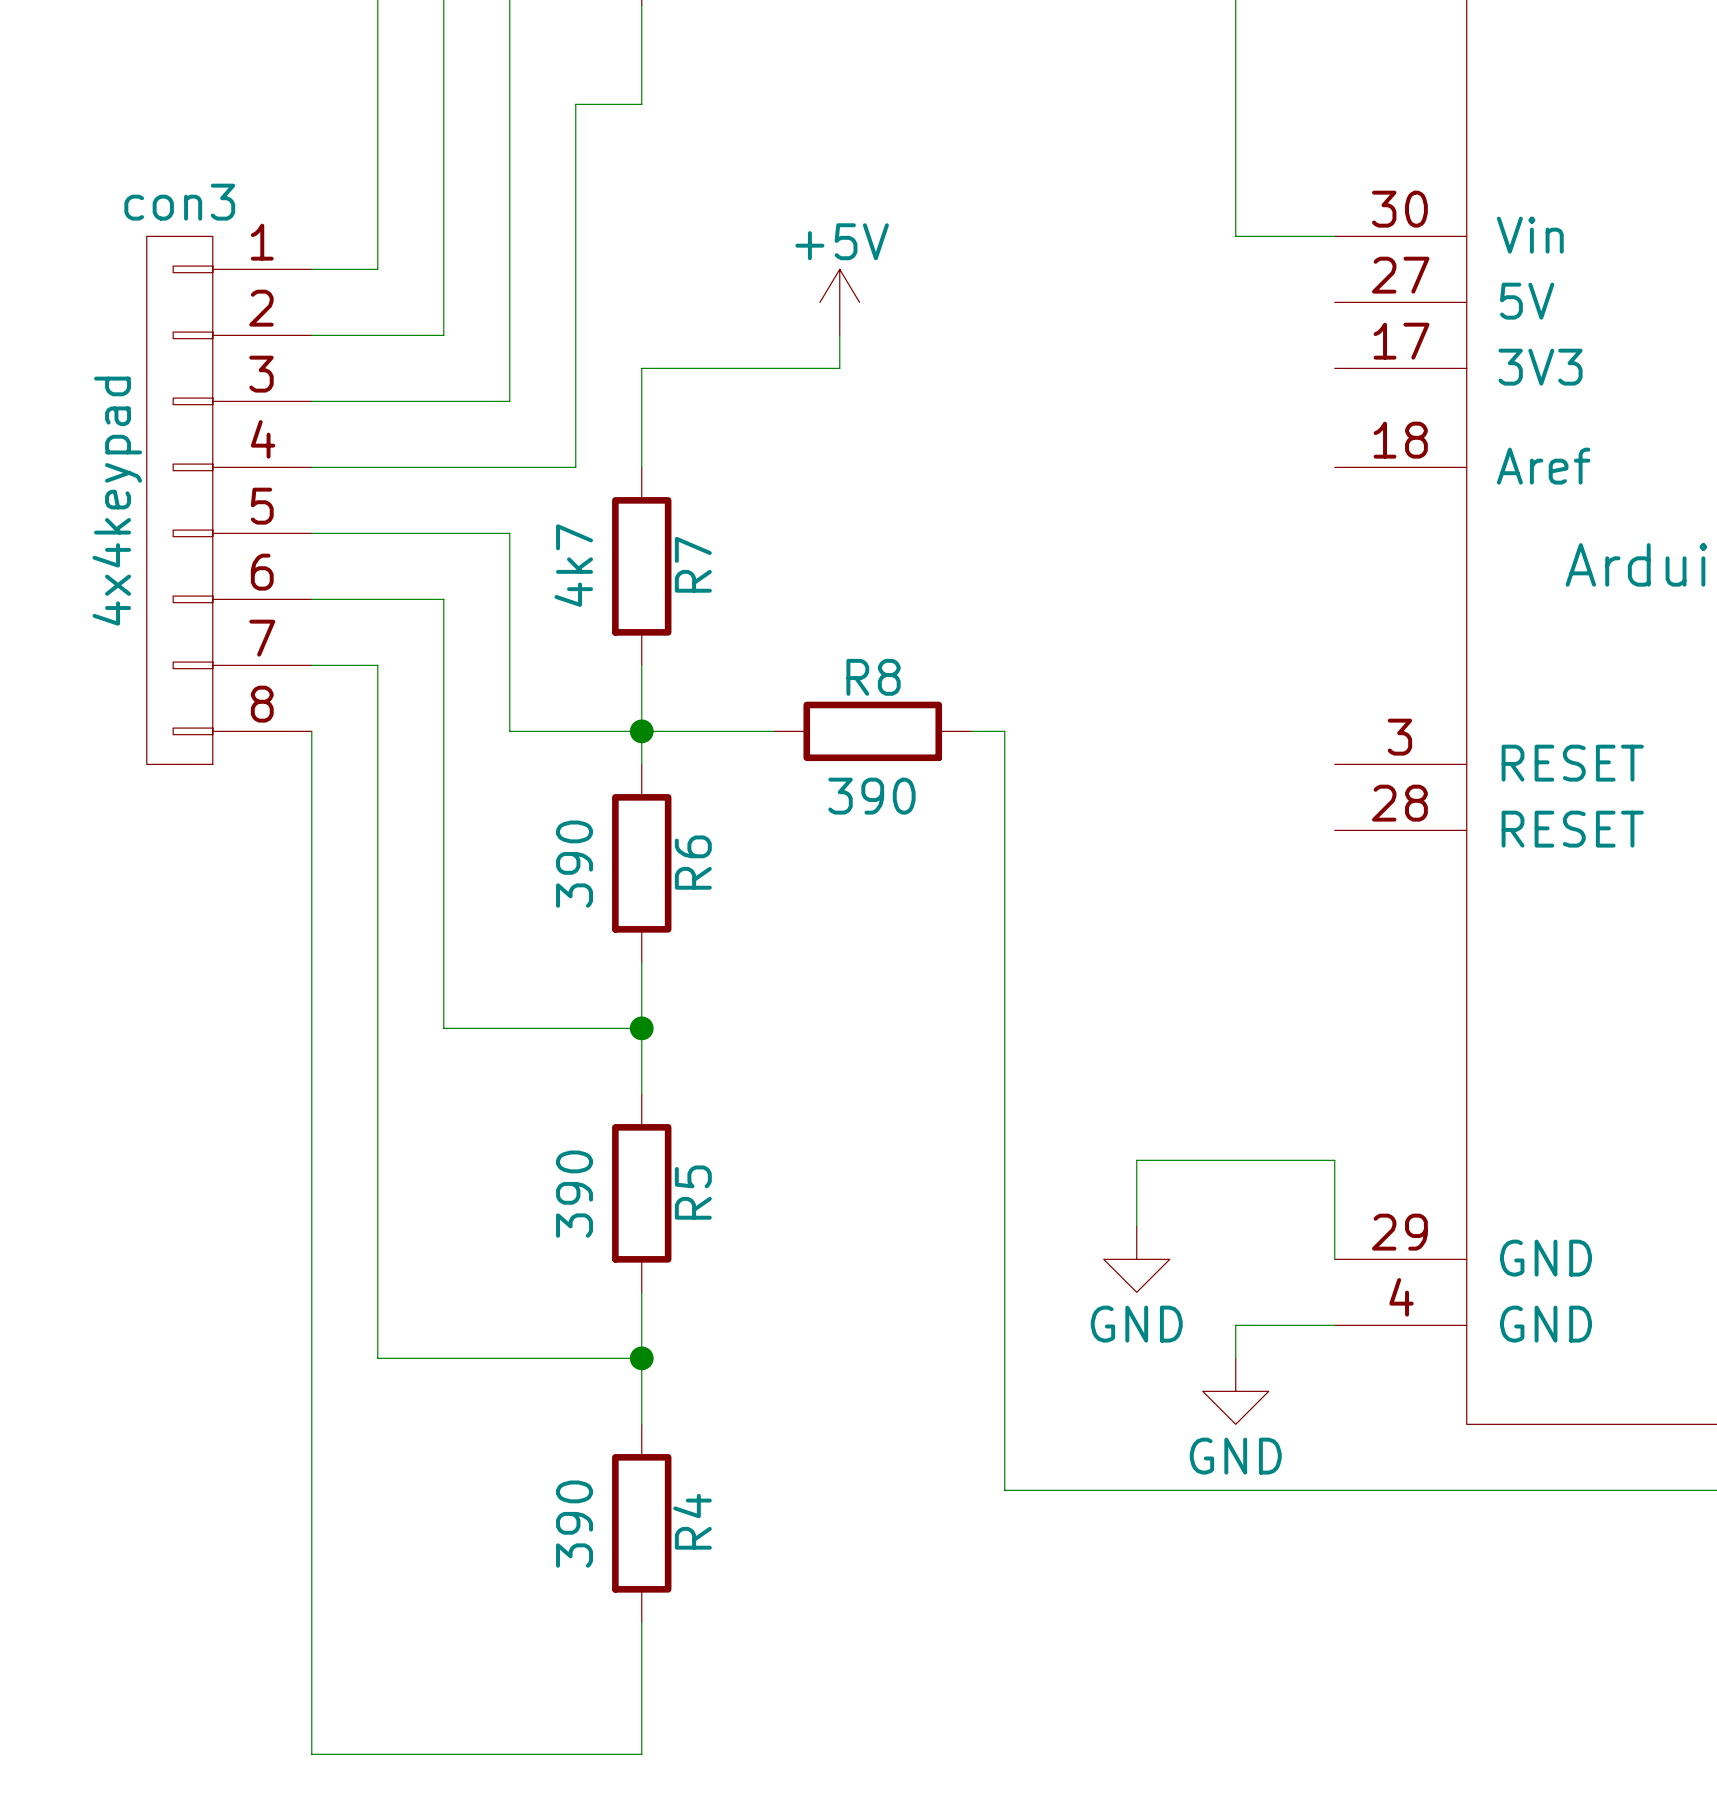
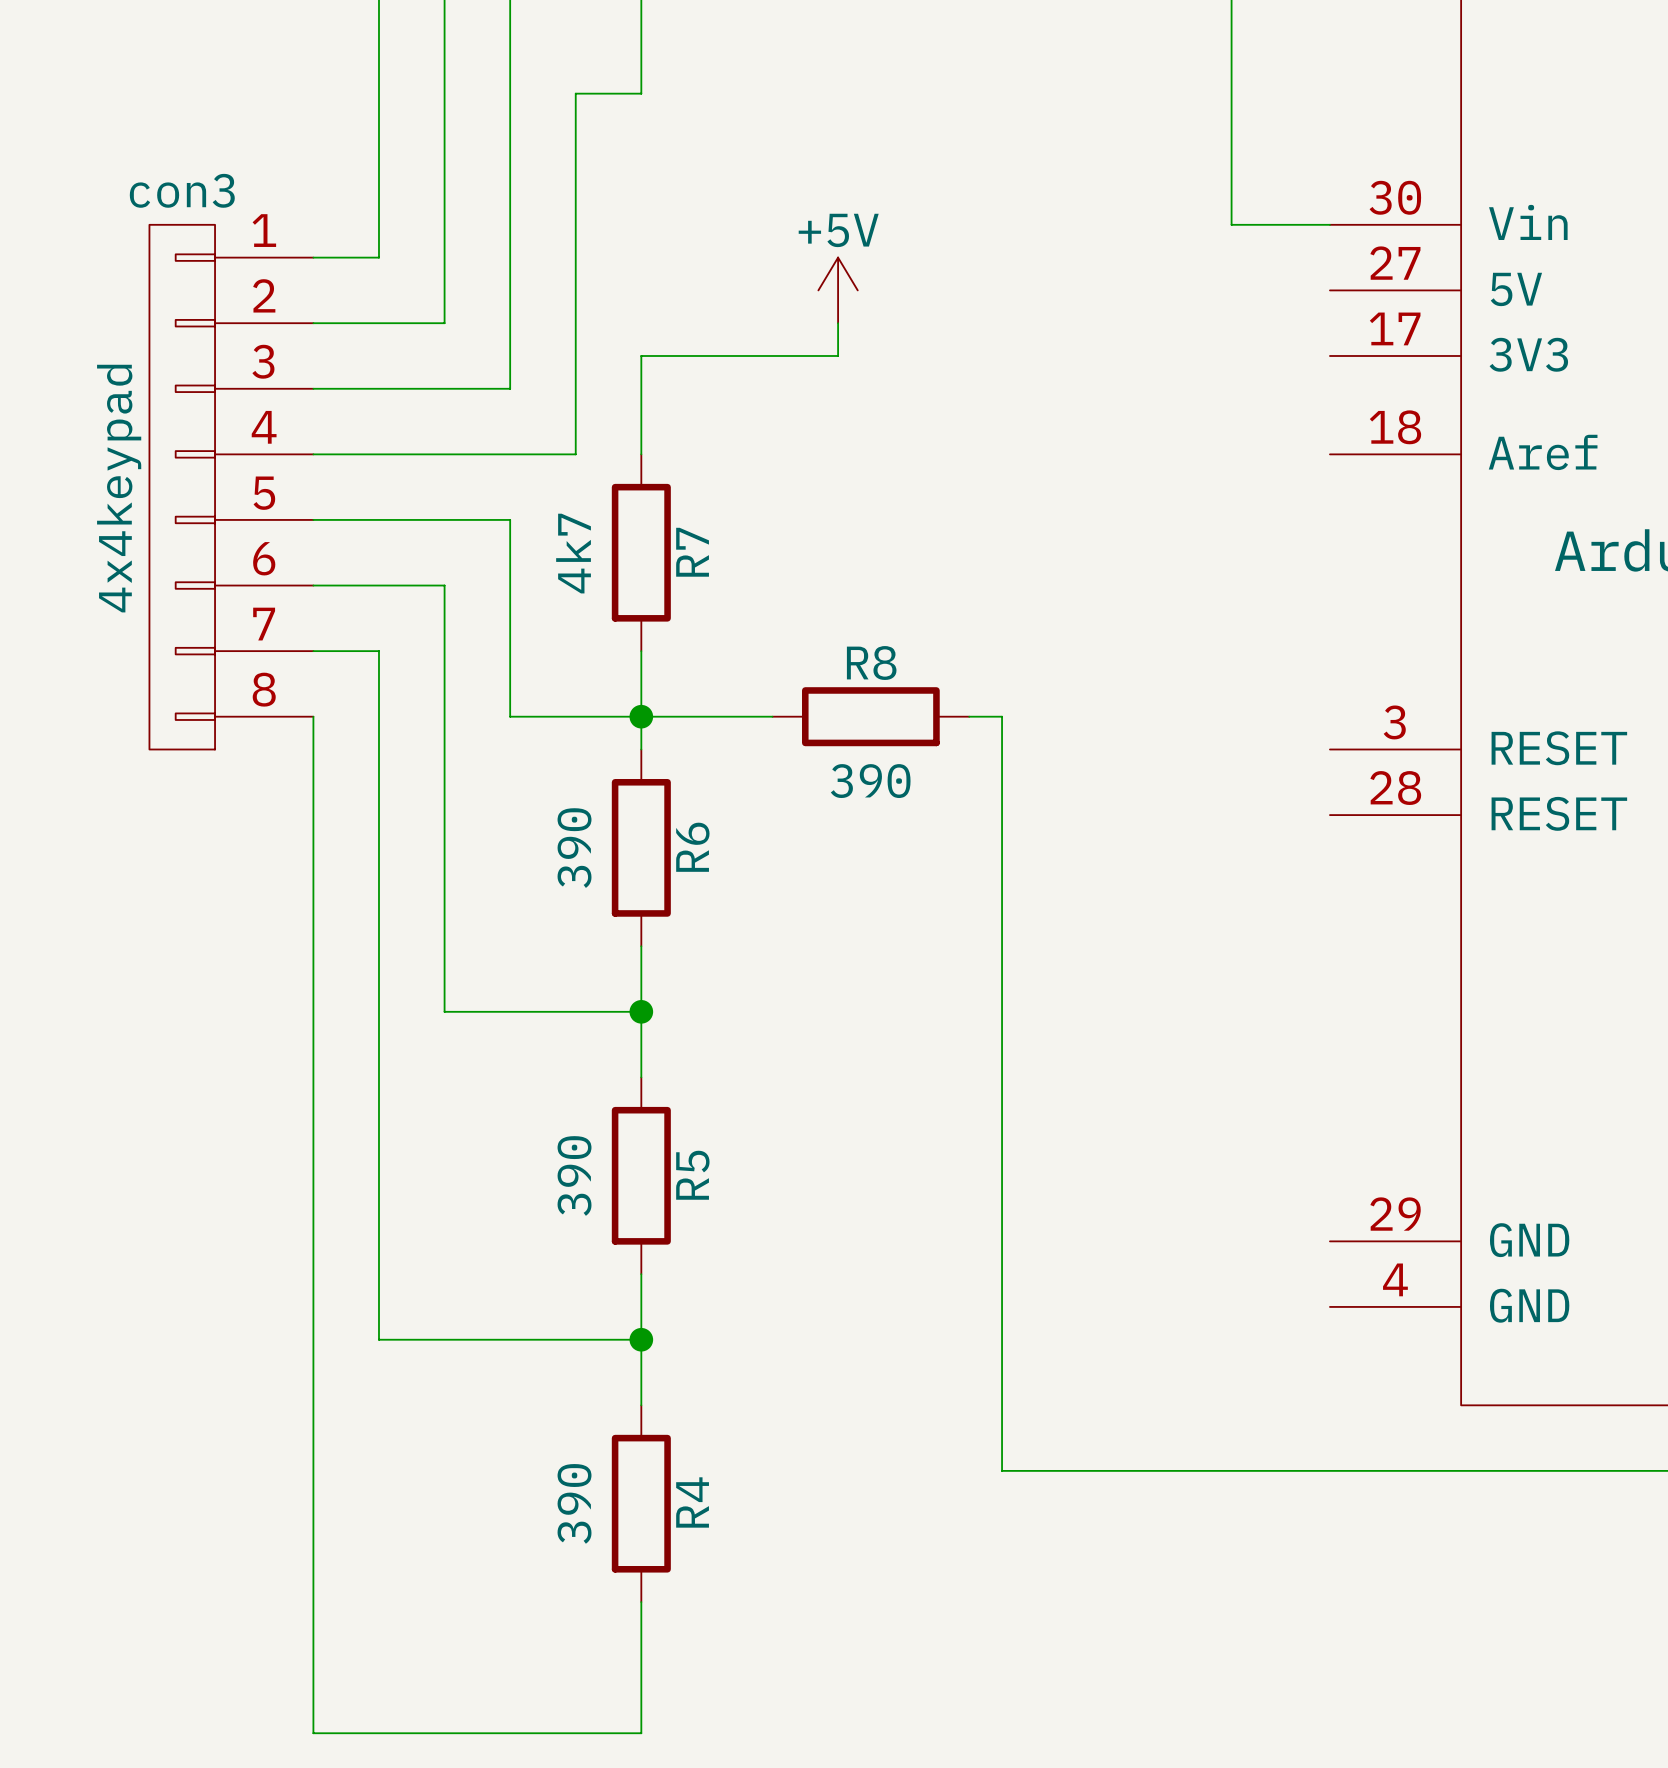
wire: (1136, 1226) (1136, 1160) (1334, 1160) (1334, 1259) -> none
power symbol: GND (1136, 1259) -> none
wire: (1334, 1325) (1235, 1325) (1235, 1358) -> none
power symbol: GND (1235, 1391) -> none

